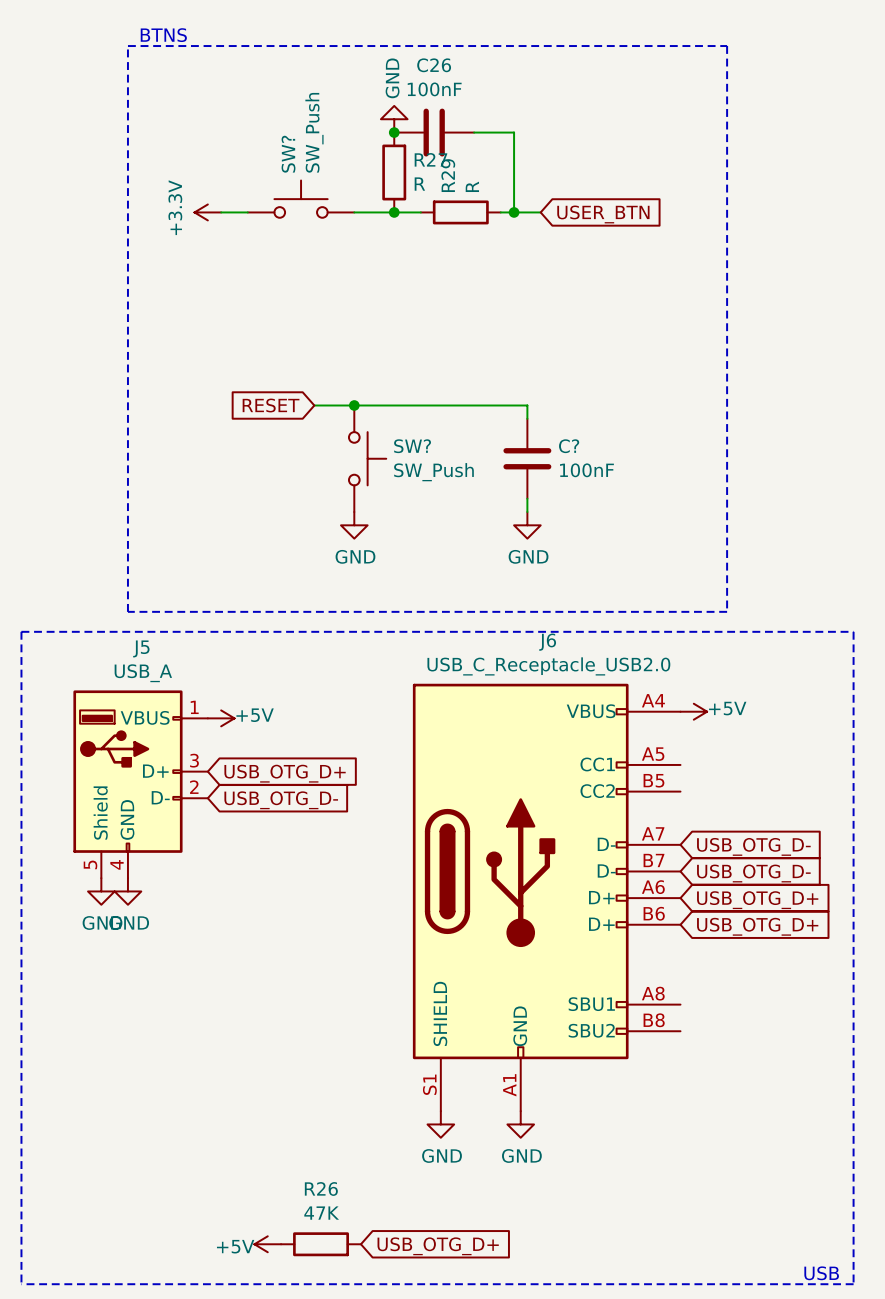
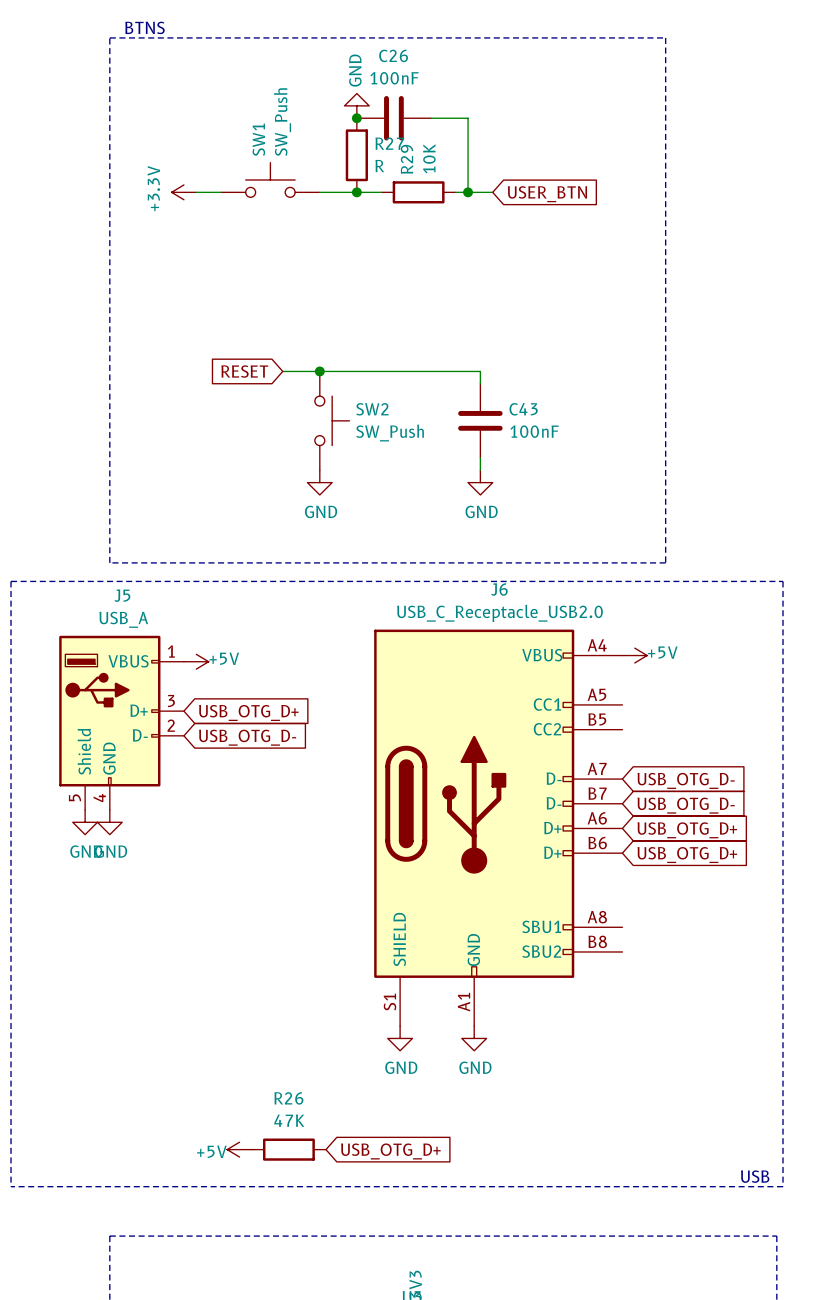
SW? name: SW? (288, 154) -> SW1 (258, 139)
R29 value: R (472, 186) -> 10K (429, 158)
SW? name: SW? (412, 446) -> SW2 (372, 409)
C? name: C? (569, 446) -> C43 (523, 409)

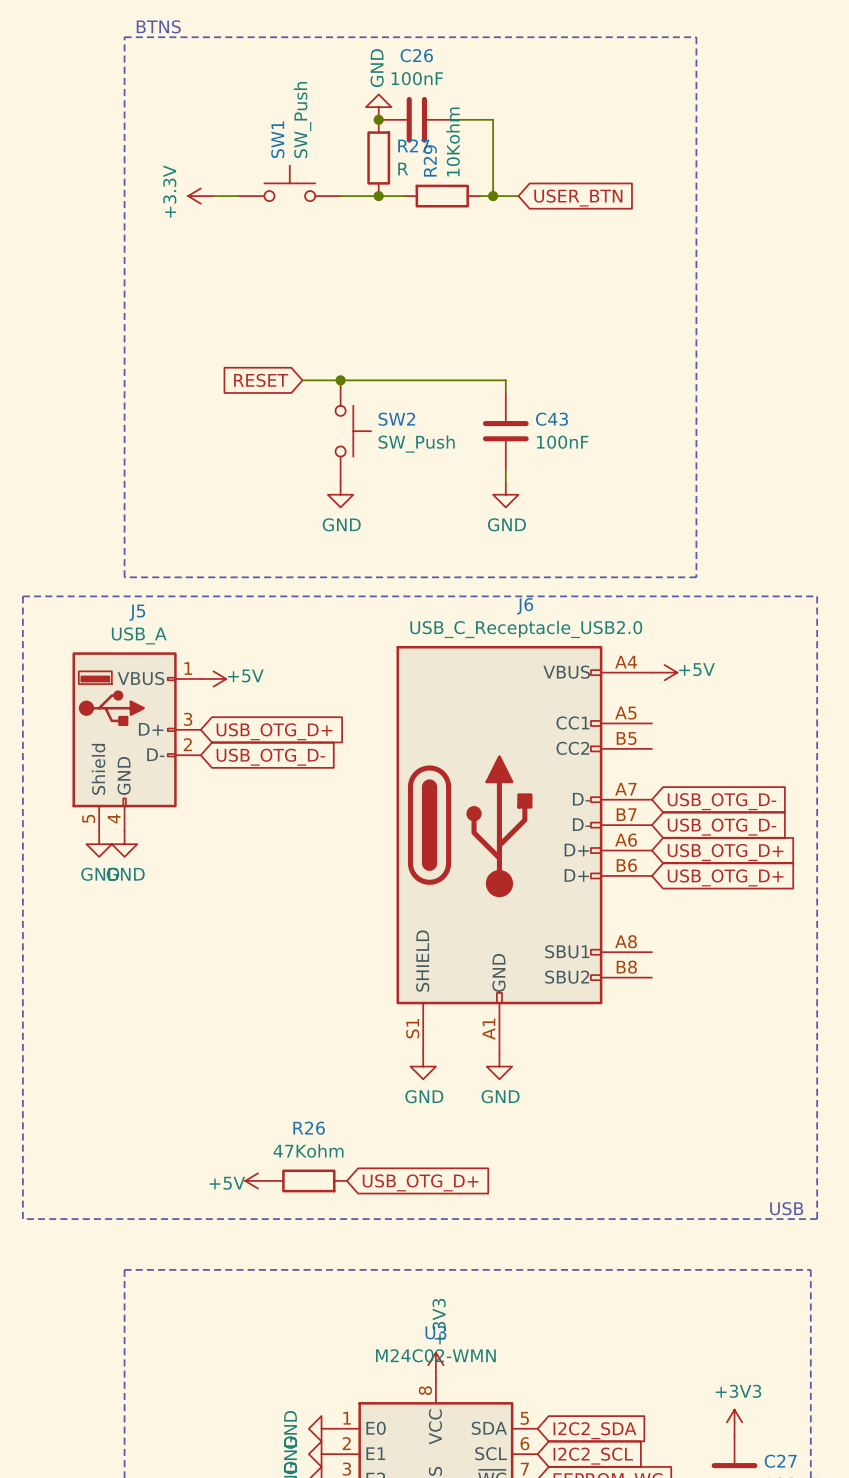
R29 value: 10K (429, 158) -> 10Kohm (453, 141)
R26 value: 47K (289, 1120) -> 47Kohm (308, 1151)

